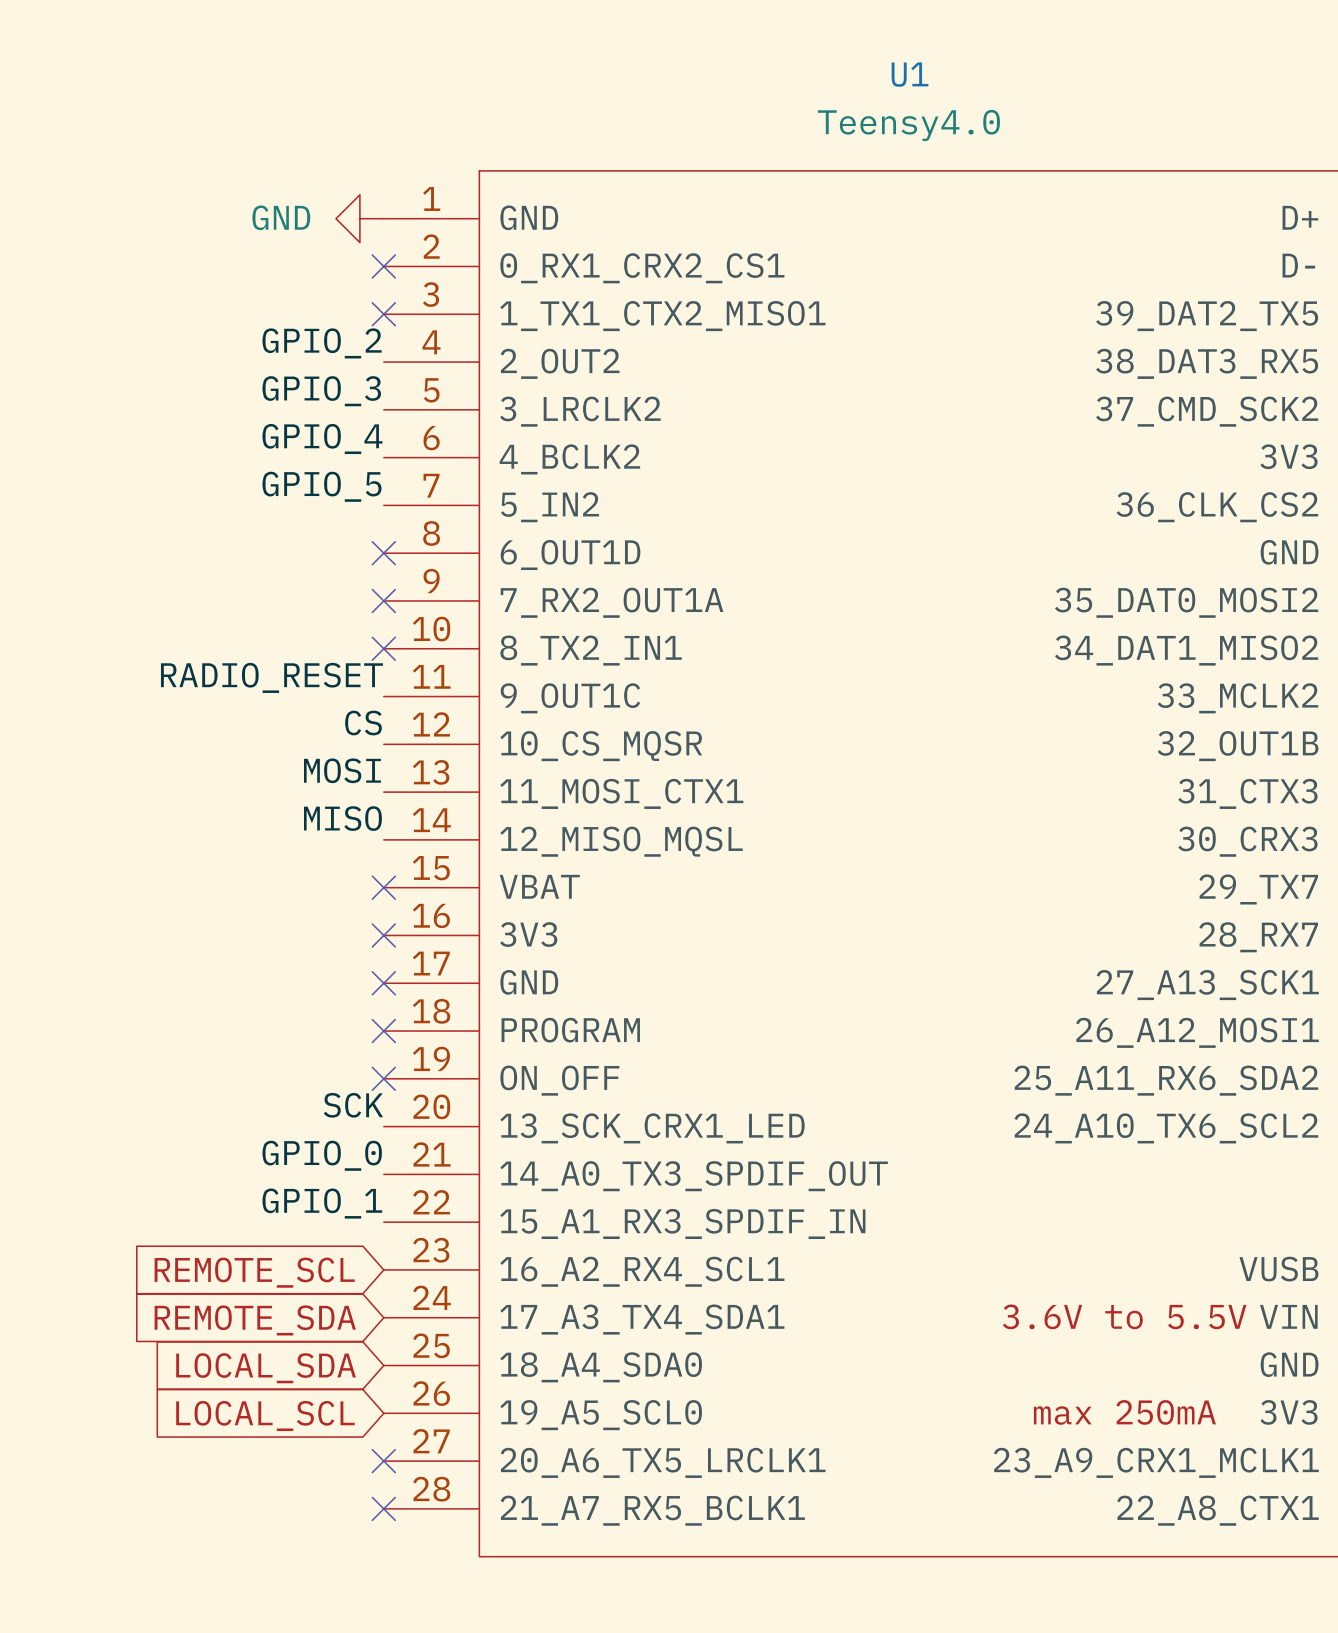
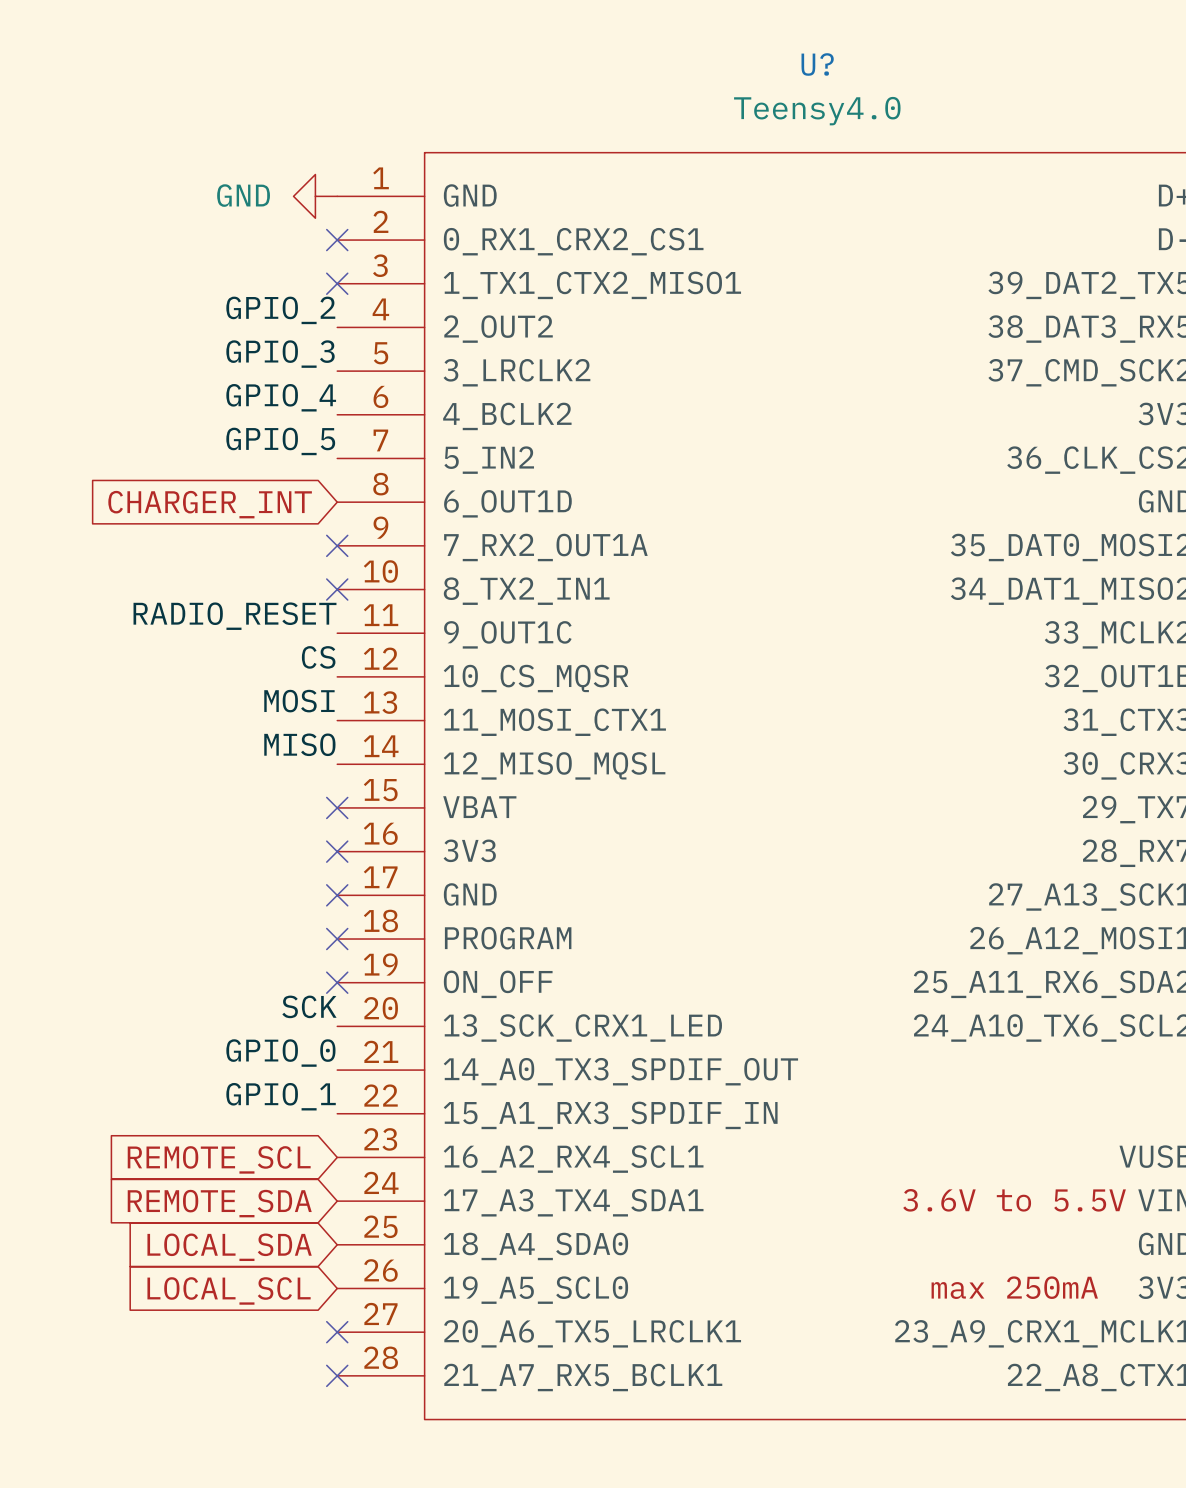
U1 name: U1 (910, 74) -> U? (817, 64)
no-connect mark: (383, 553) -> none
global label: none -> CHARGER_INT (210, 504)

